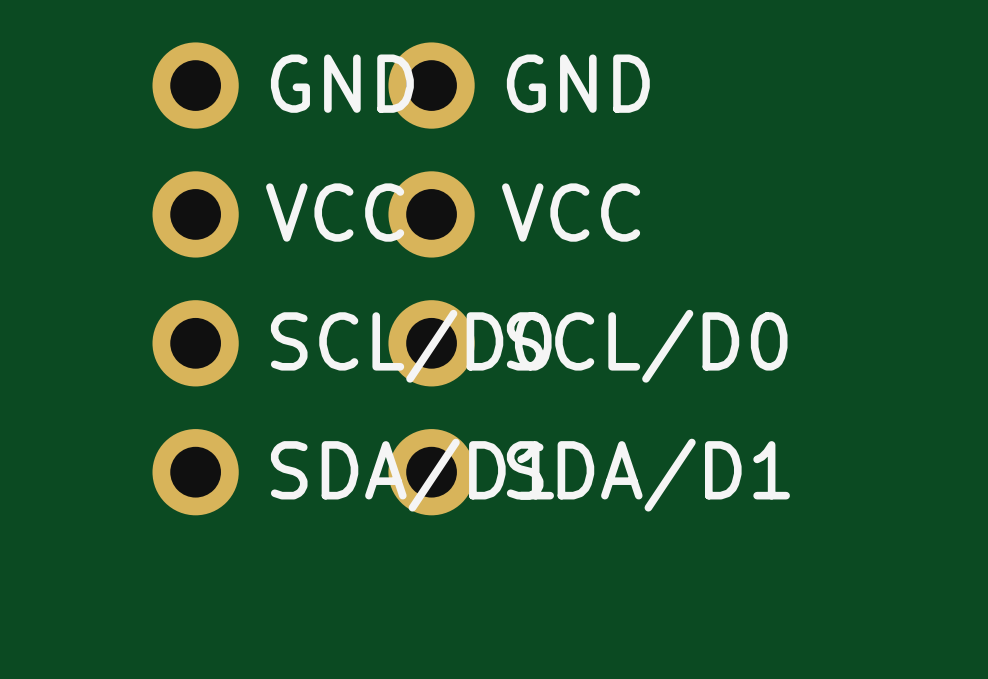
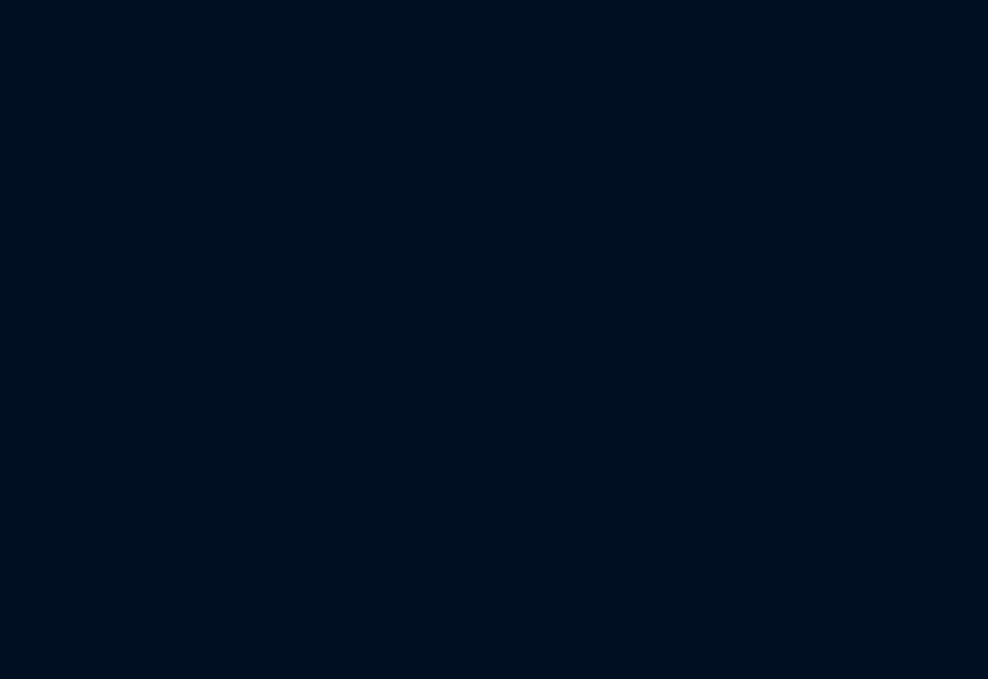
part: (195, 278) -> none
part: (431, 278) -> none

